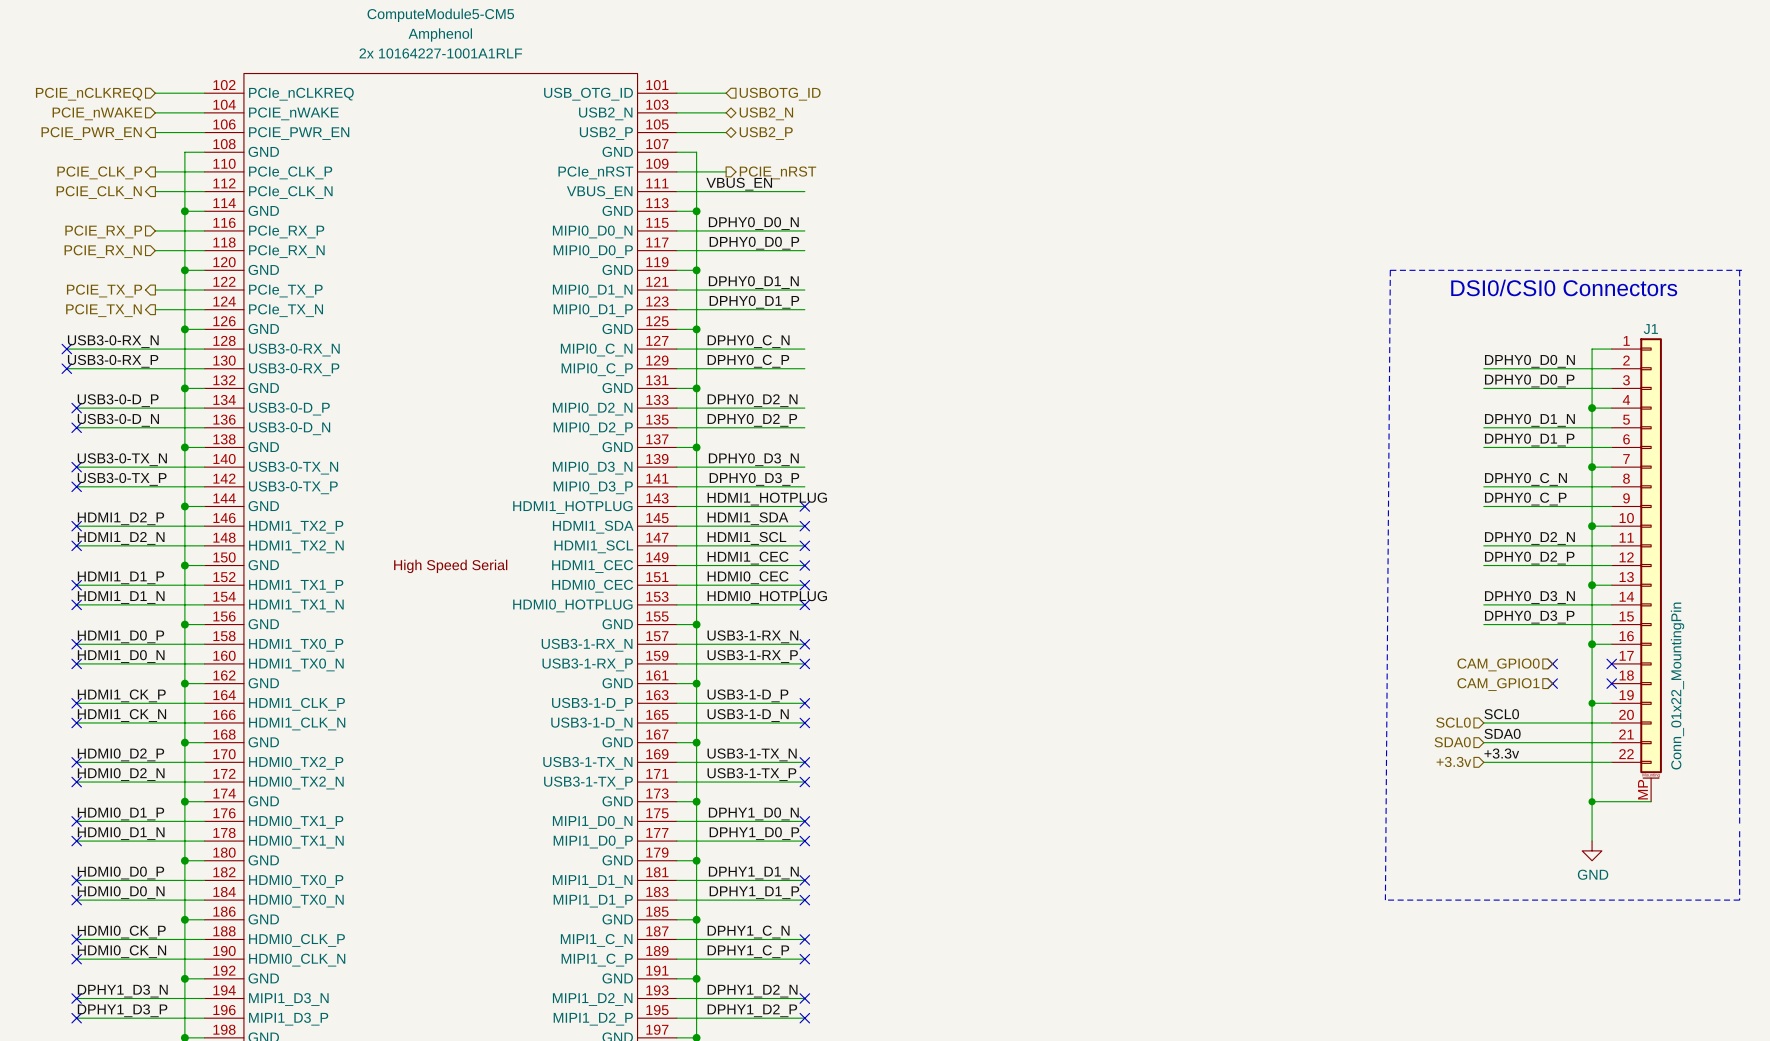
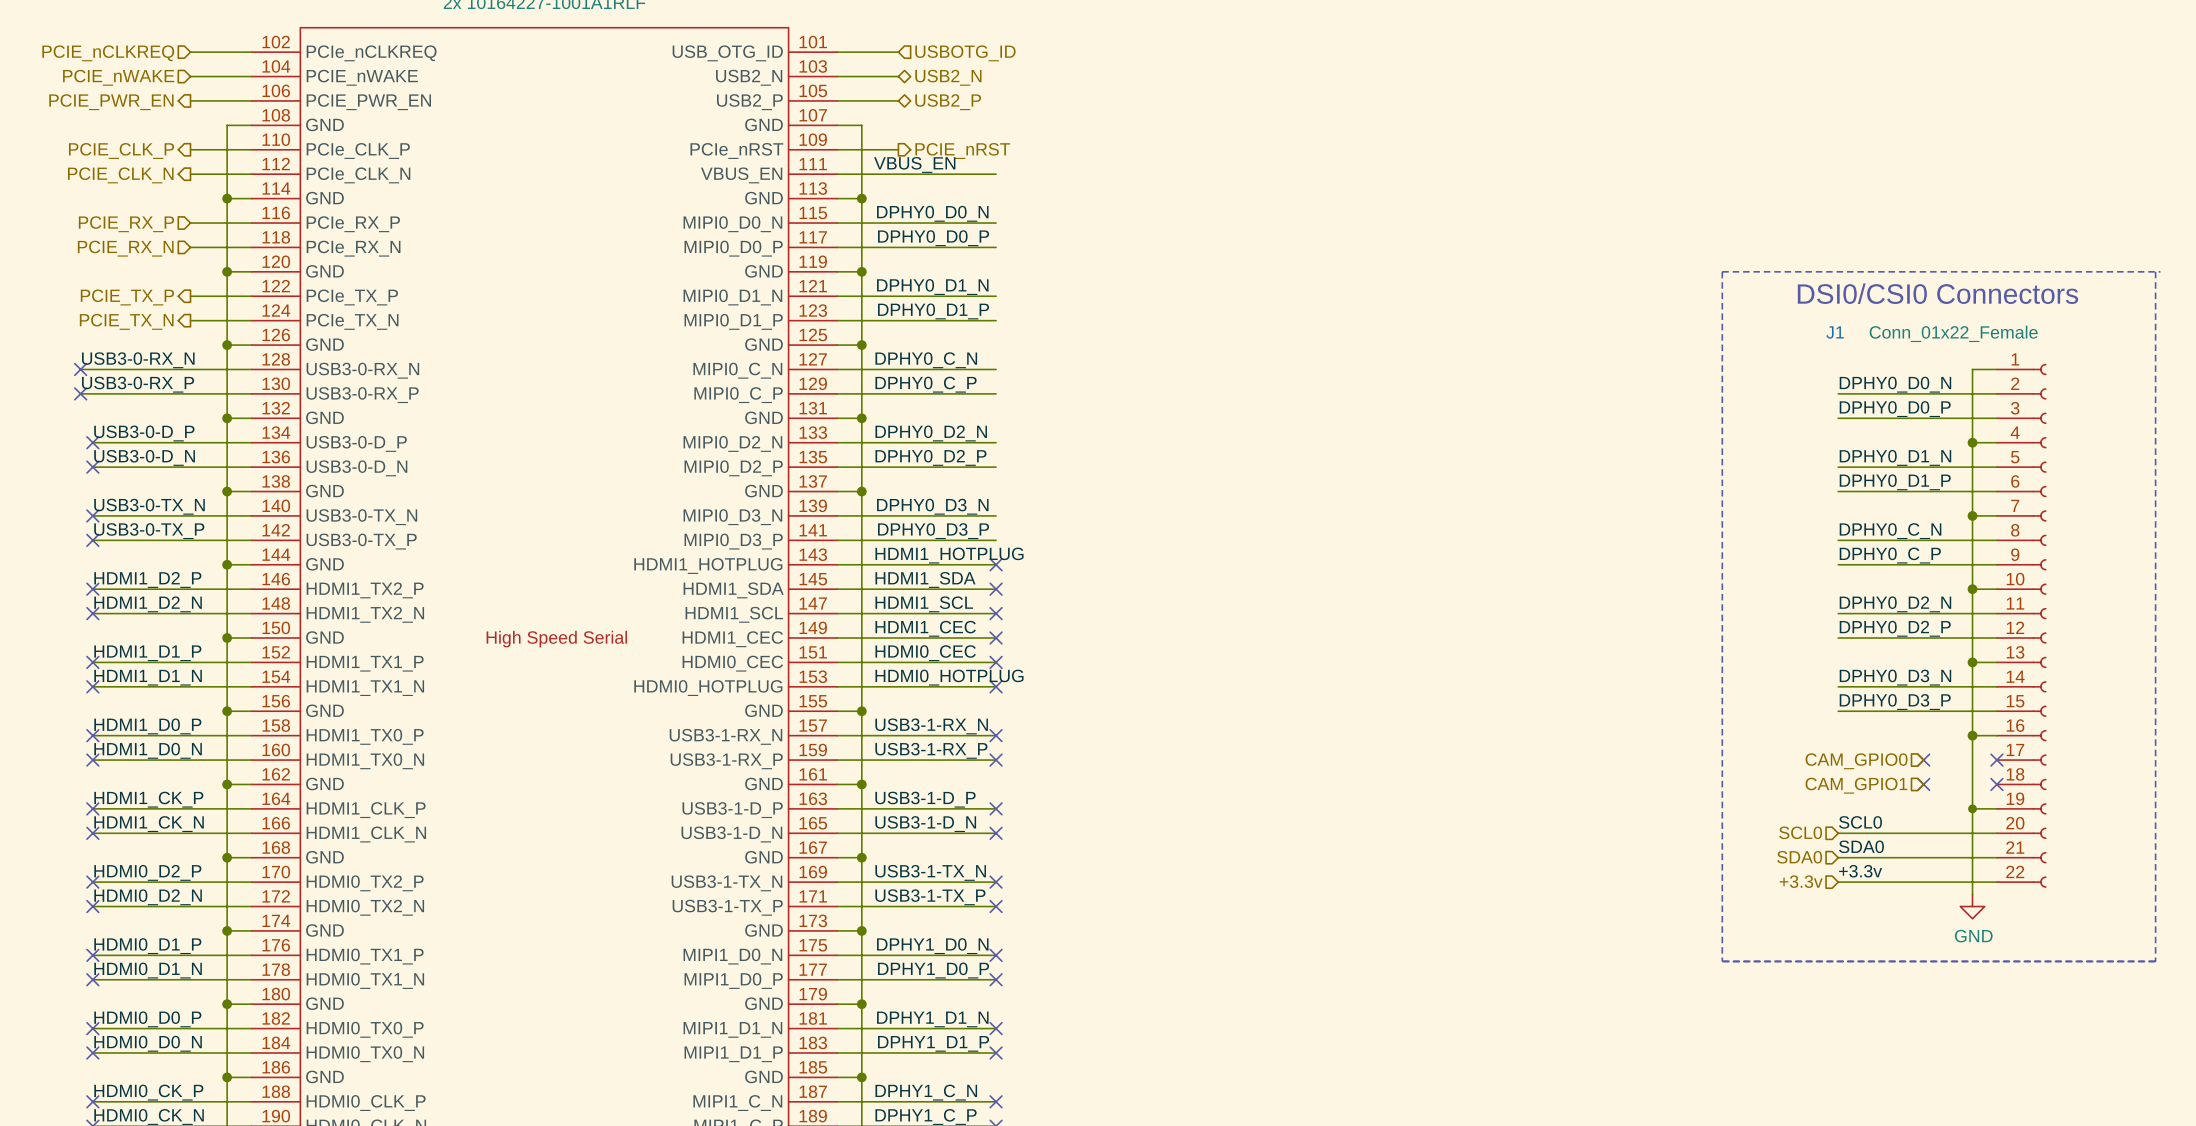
line: (1390, 270) (1385, 900) (1739, 900) (1739, 831) -> (1722, 271) (1722, 961) (2155, 961)
J1 name position: J1 (1650, 329) -> J1 (1835, 332)
J1 symbol: [1611, 338, 1662, 802] -> [1996, 363, 2047, 888]
J1 value: Conn_01x22_MountingPin (1677, 686) -> Conn_01x22_Female (1953, 333)
wire: (1592, 772) (1592, 841) -> none
wire: (1592, 801) (1651, 801) -> none
junction: (1592, 801) -> none
power symbol position: GND (1592, 850) -> GND (1972, 906)

